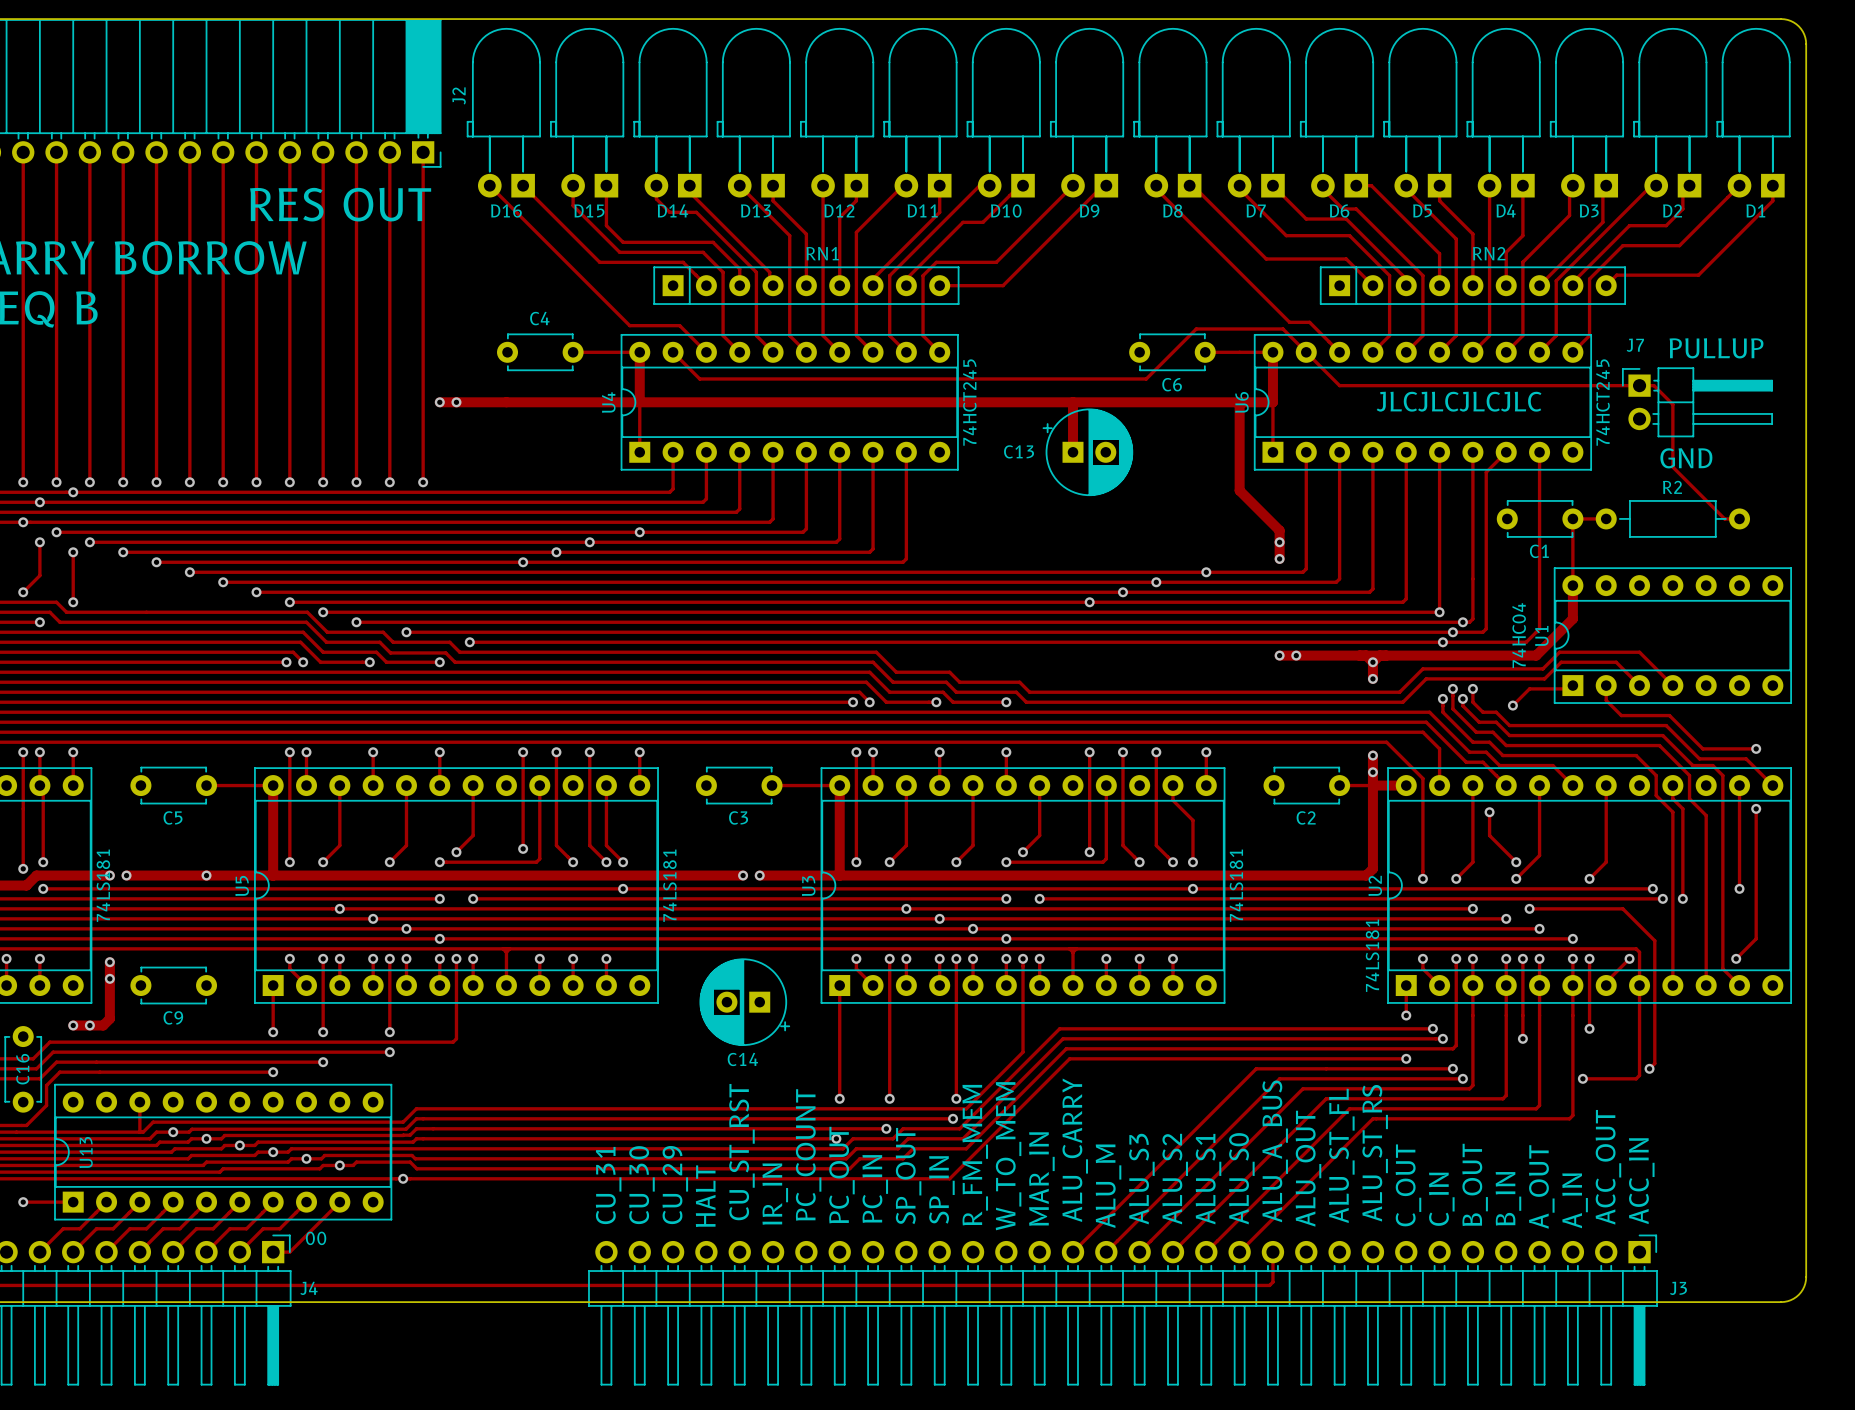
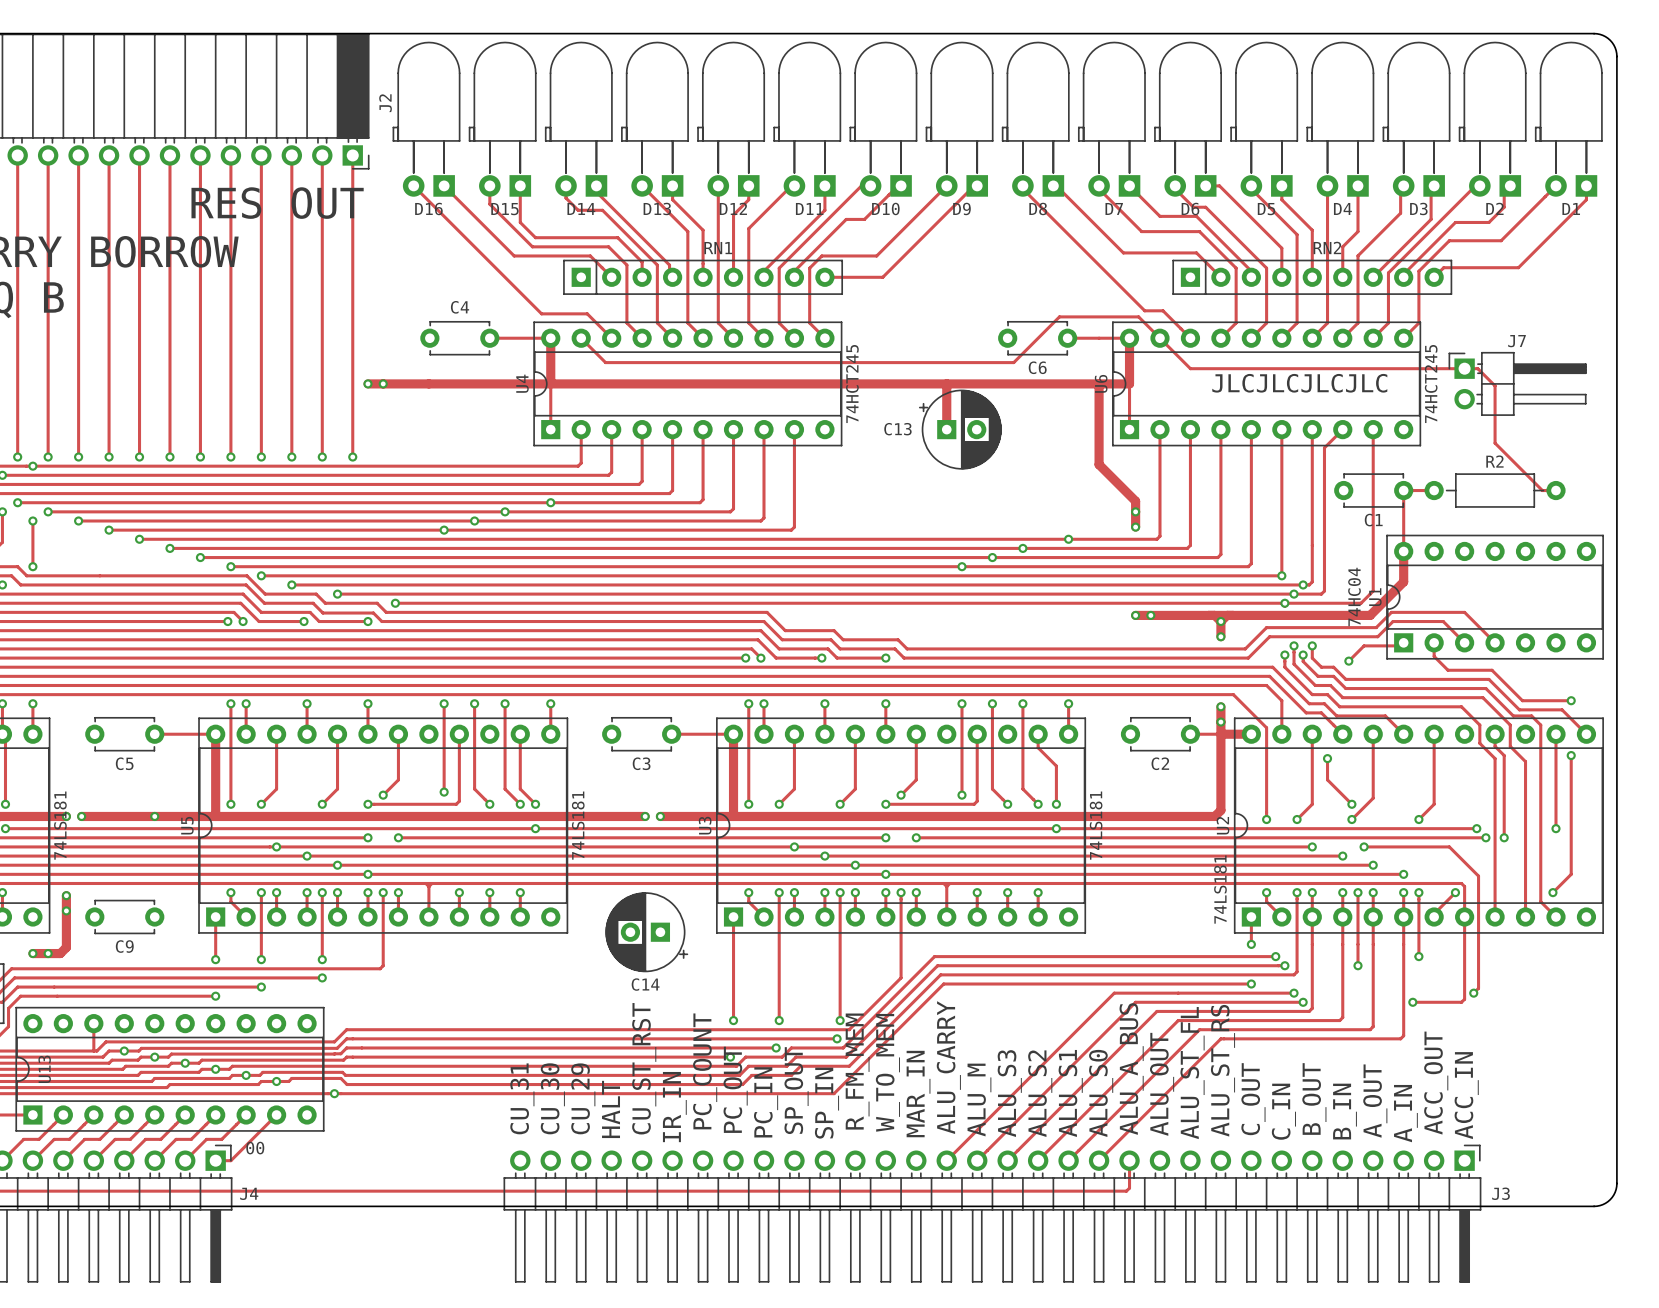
J7 name position: J7 (1635, 345) -> J7 (1517, 341)
text: PULLUP (1716, 348) -> none
text: GND (1686, 458) -> none

